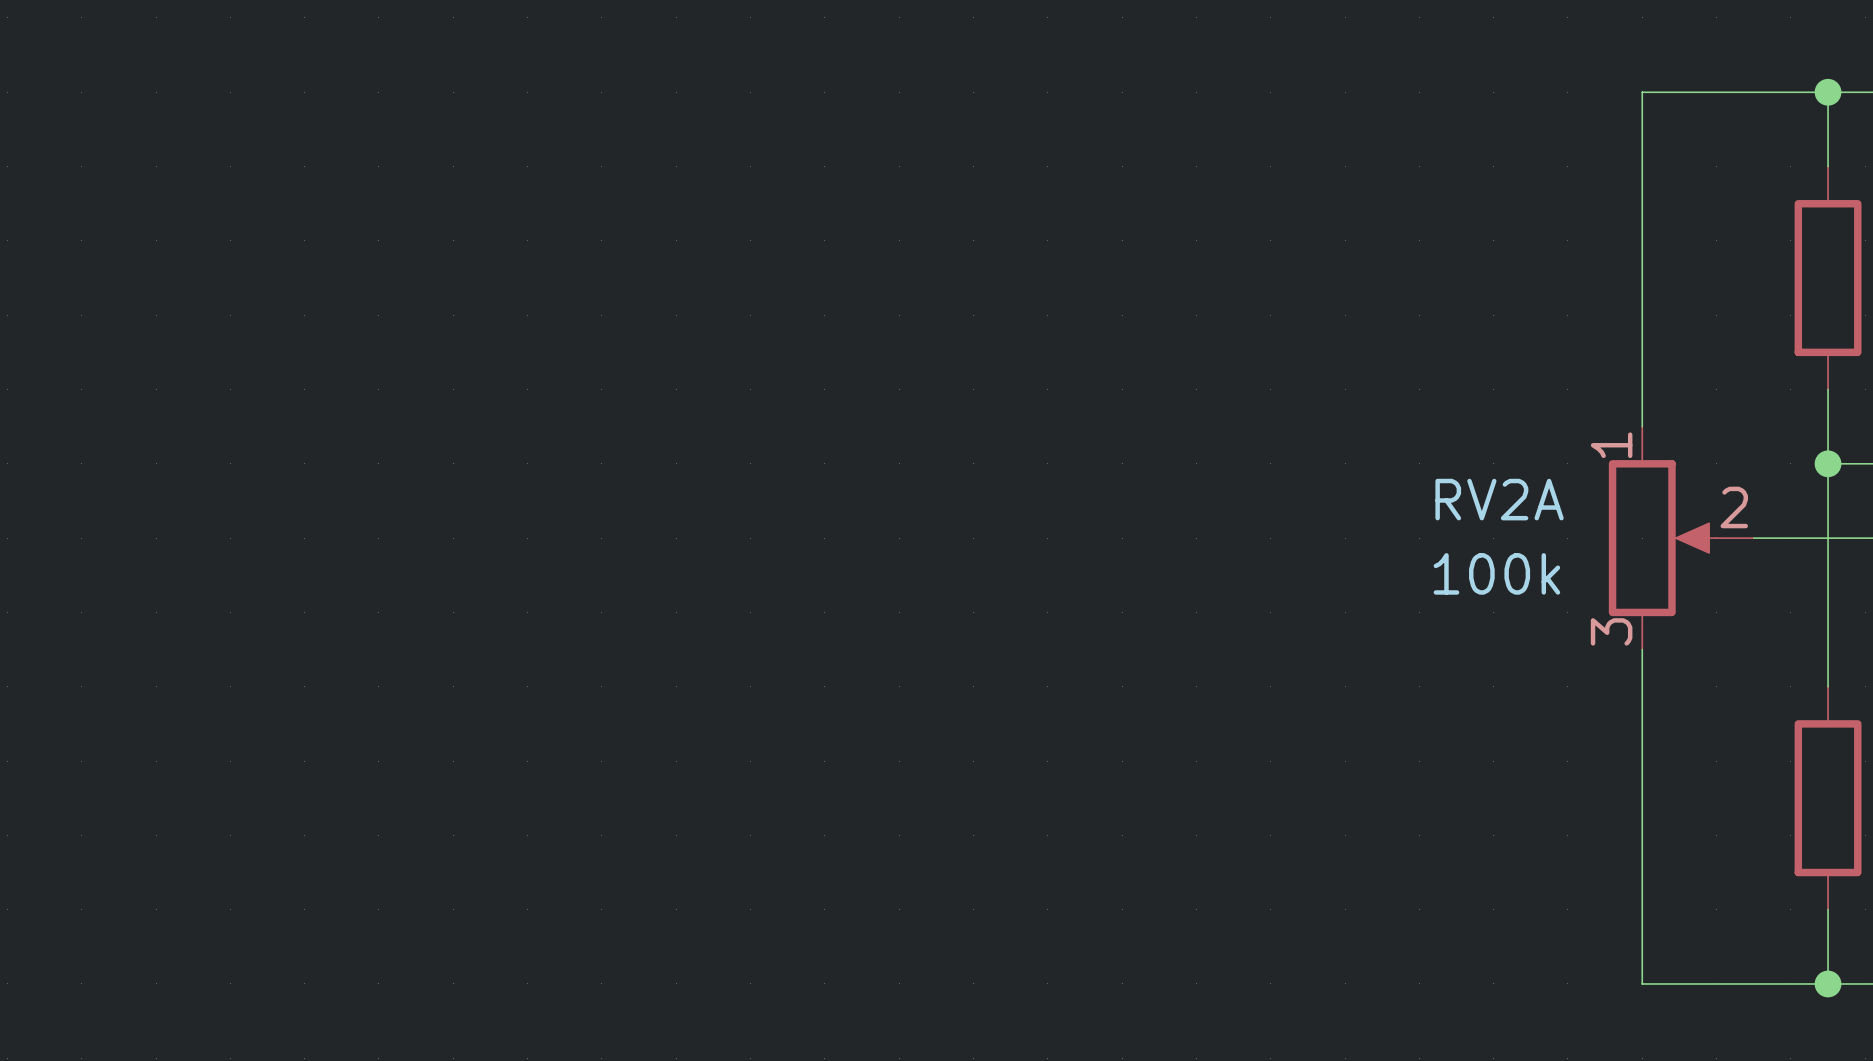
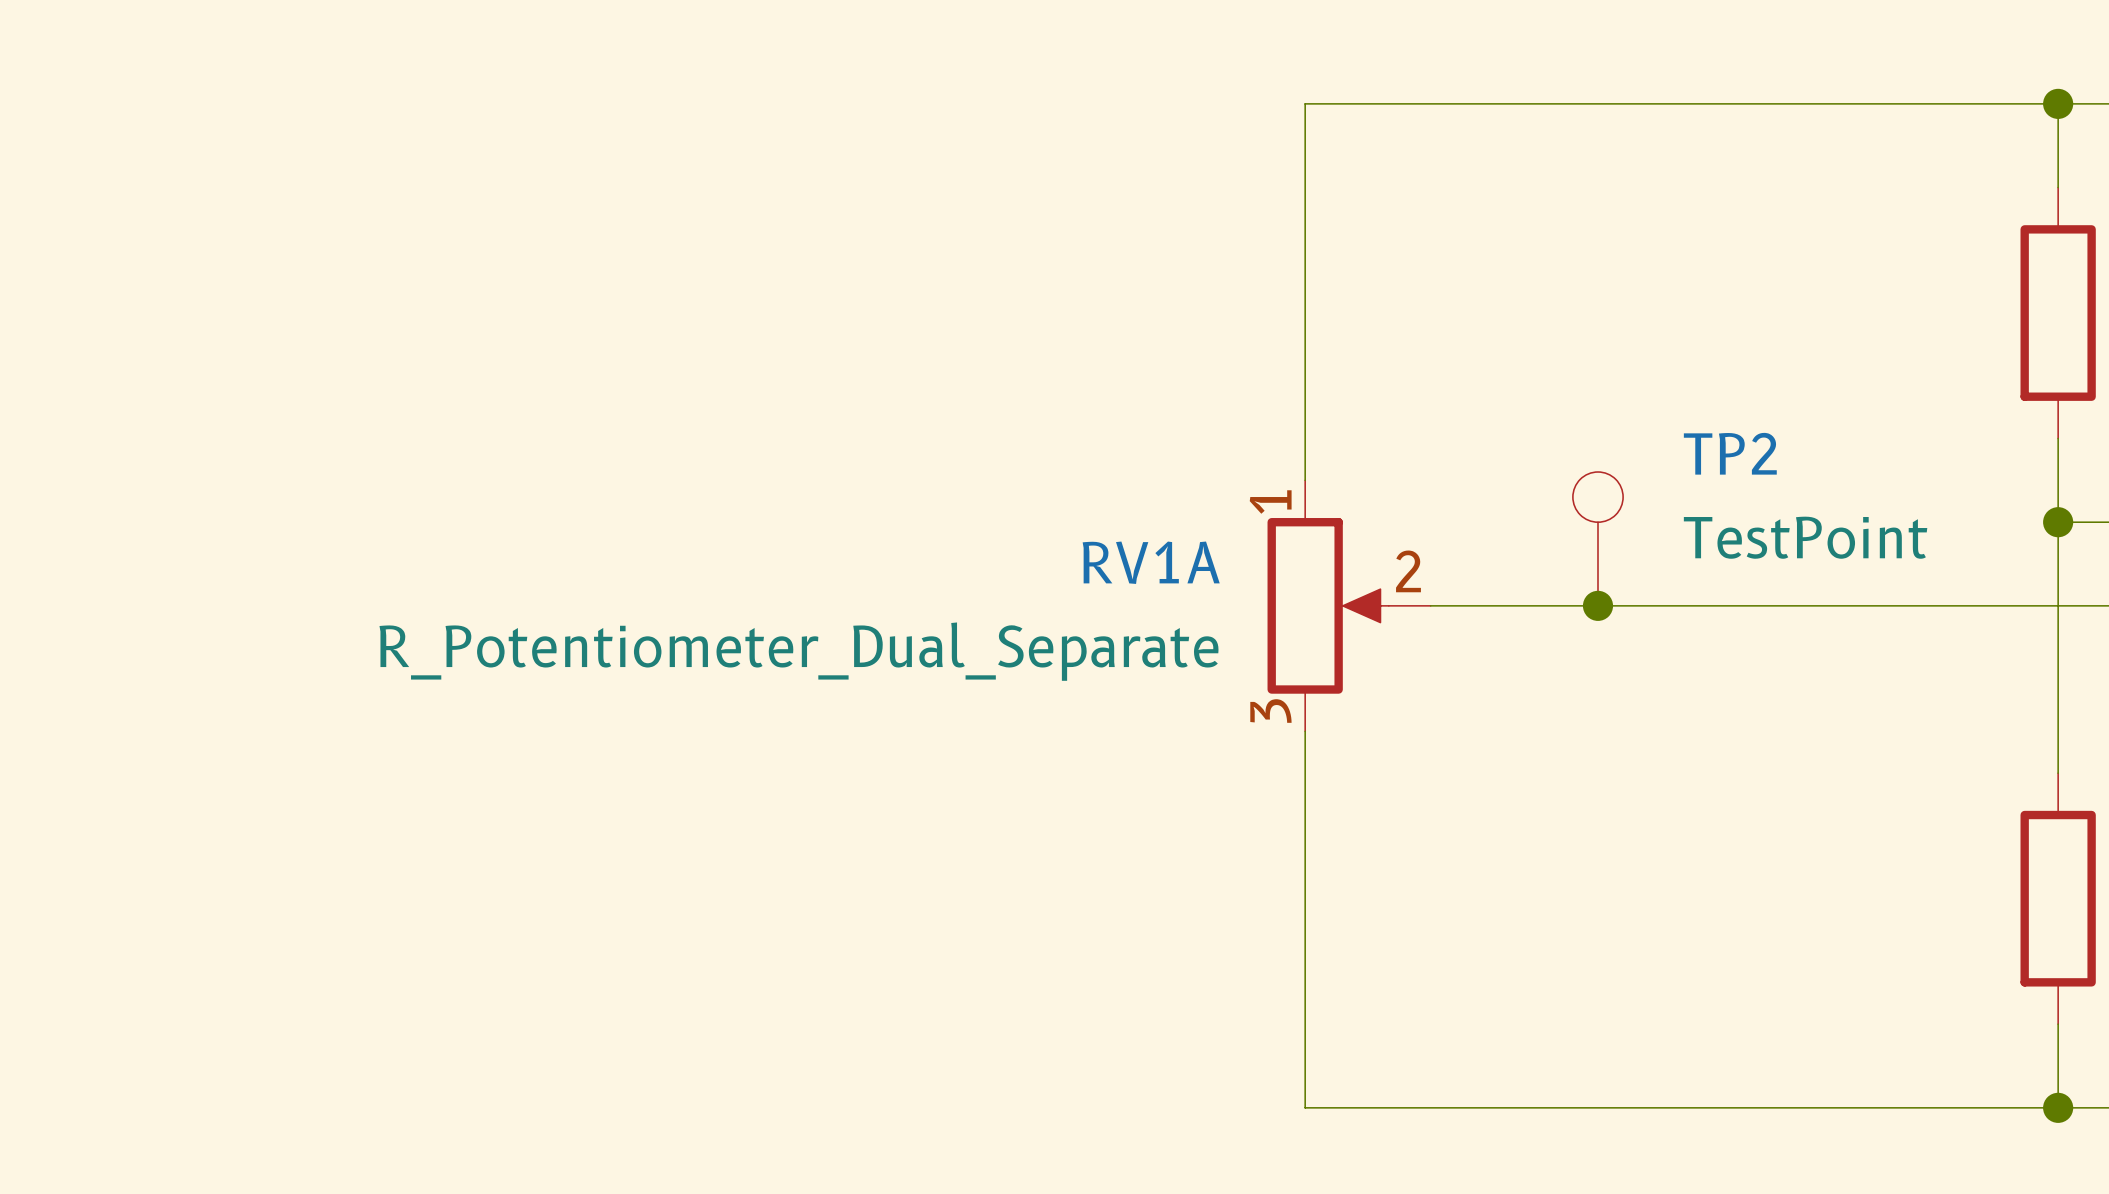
wire: (1642, 92) (1642, 426) -> (1848, 103) (1305, 103) (1305, 480)
TP2: none -> TestPoint (1597, 538)
RV1A: none -> R_Potentiometer_Dual_Separate (1349, 605)
wire: none -> (1430, 605) (1974, 605)
junction: none -> (1597, 605)
RV2A: 100k (1681, 538) -> none
wire: (1642, 649) (1642, 983) -> (1305, 731) (1305, 1107) (1848, 1107)

